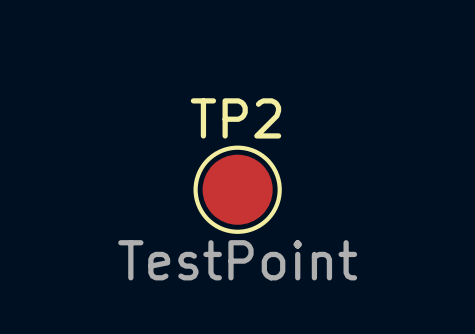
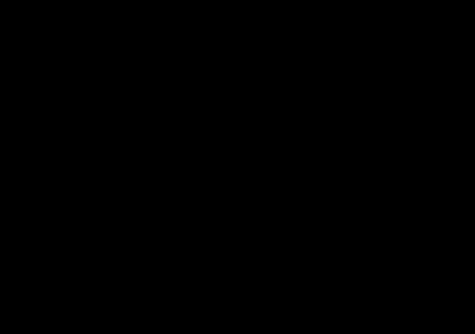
TP2: TestPoint (237, 189) -> none

